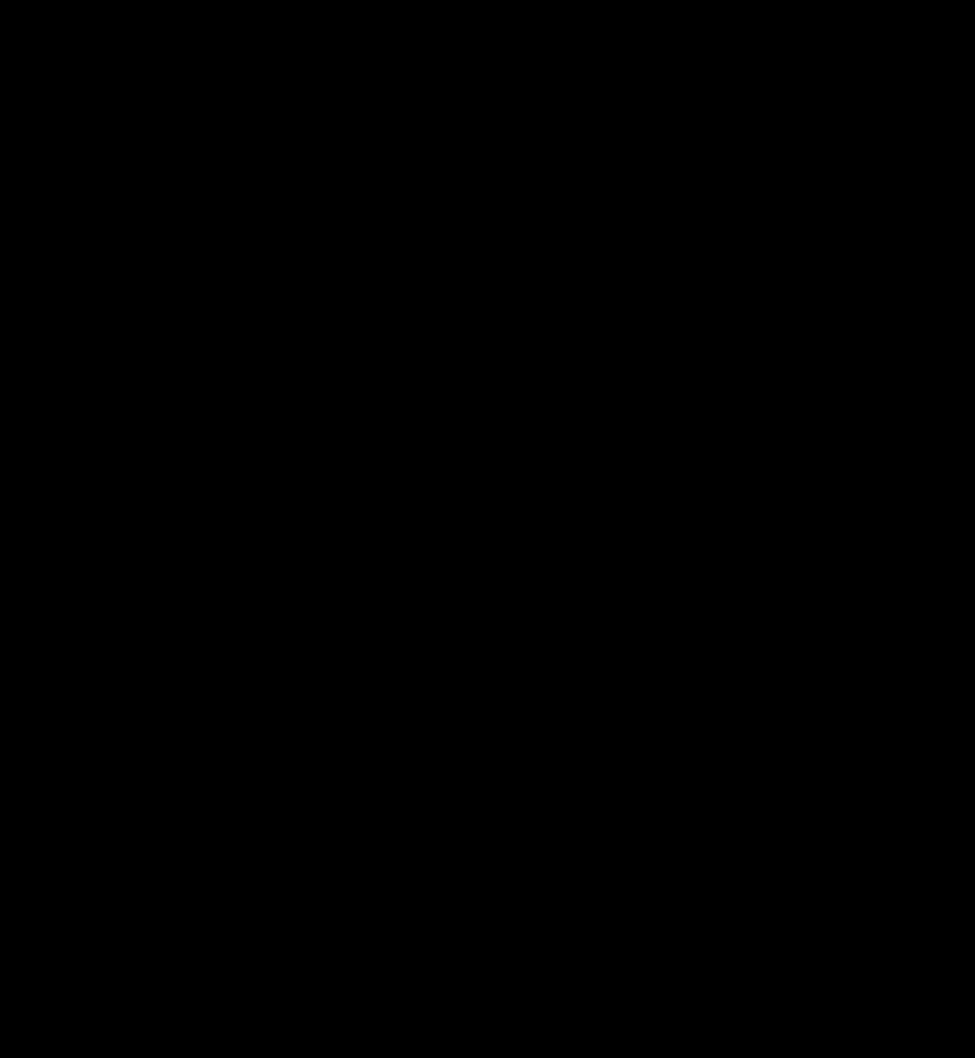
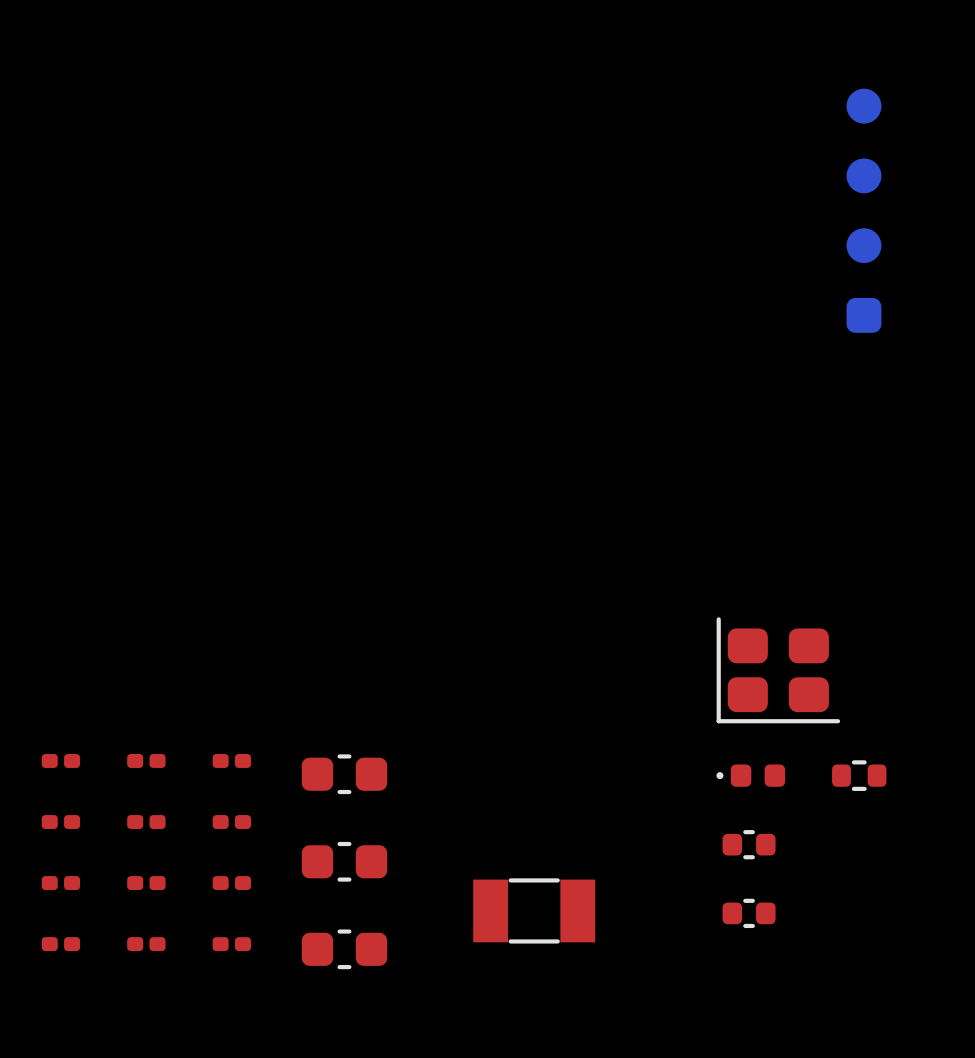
part: none -> (863, 106)
part: none -> (863, 175)
part: none -> (863, 245)
part: none -> (863, 315)
part: none -> (778, 670)
part: none -> (60, 760)
part: none -> (146, 760)
part: none -> (231, 760)
part: none -> (344, 774)
part: none -> (750, 775)
part: none -> (859, 775)
part: none -> (60, 822)
part: none -> (146, 822)
part: none -> (231, 822)
part: none -> (749, 844)
part: none -> (344, 861)
part: none -> (60, 883)
part: none -> (146, 883)
part: none -> (231, 883)
part: none -> (534, 910)
part: none -> (749, 913)
part: none -> (60, 944)
part: none -> (146, 944)
part: none -> (231, 944)
part: none -> (344, 949)

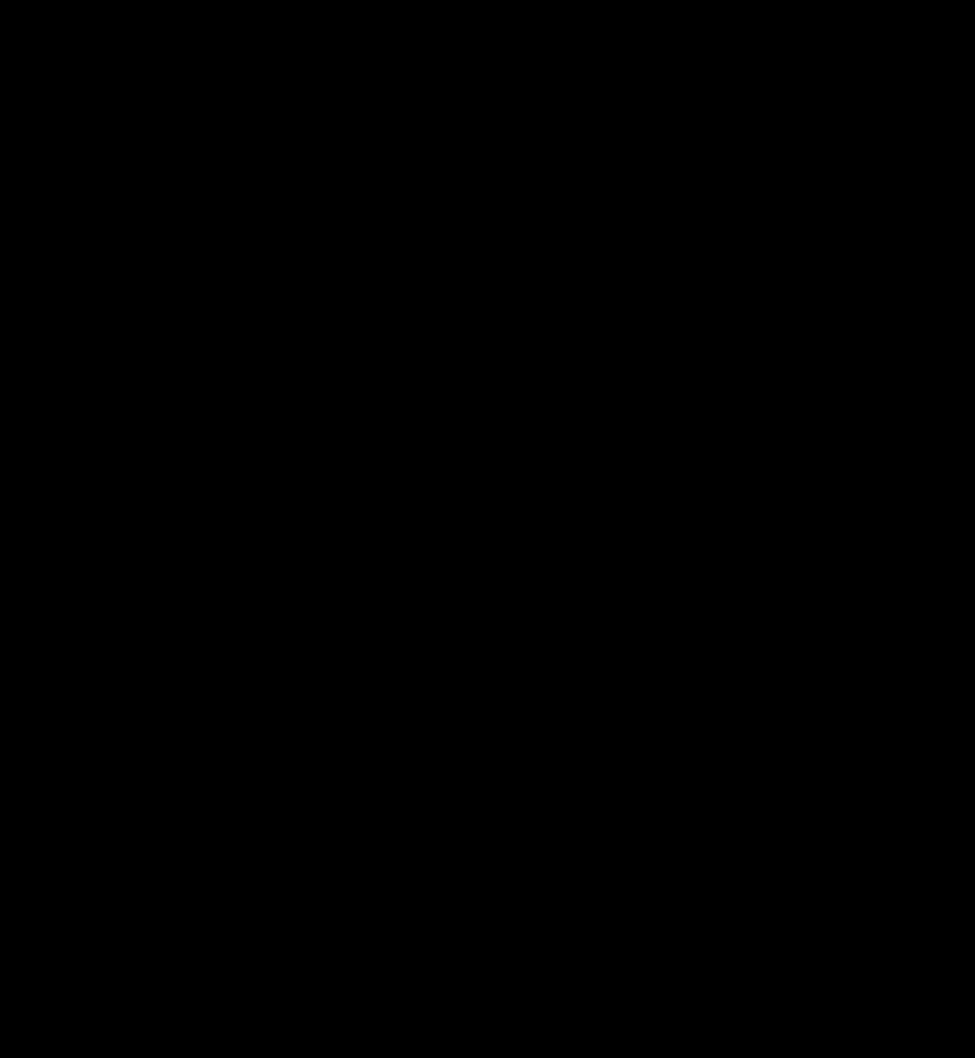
part: (863, 106) -> none
part: (863, 175) -> none
part: (863, 245) -> none
part: (863, 315) -> none
part: (778, 670) -> none
part: (60, 760) -> none
part: (146, 760) -> none
part: (231, 760) -> none
part: (344, 774) -> none
part: (750, 775) -> none
part: (859, 775) -> none
part: (60, 822) -> none
part: (146, 822) -> none
part: (231, 822) -> none
part: (749, 844) -> none
part: (344, 861) -> none
part: (60, 883) -> none
part: (146, 883) -> none
part: (231, 883) -> none
part: (534, 910) -> none
part: (749, 913) -> none
part: (60, 944) -> none
part: (146, 944) -> none
part: (231, 944) -> none
part: (344, 949) -> none

